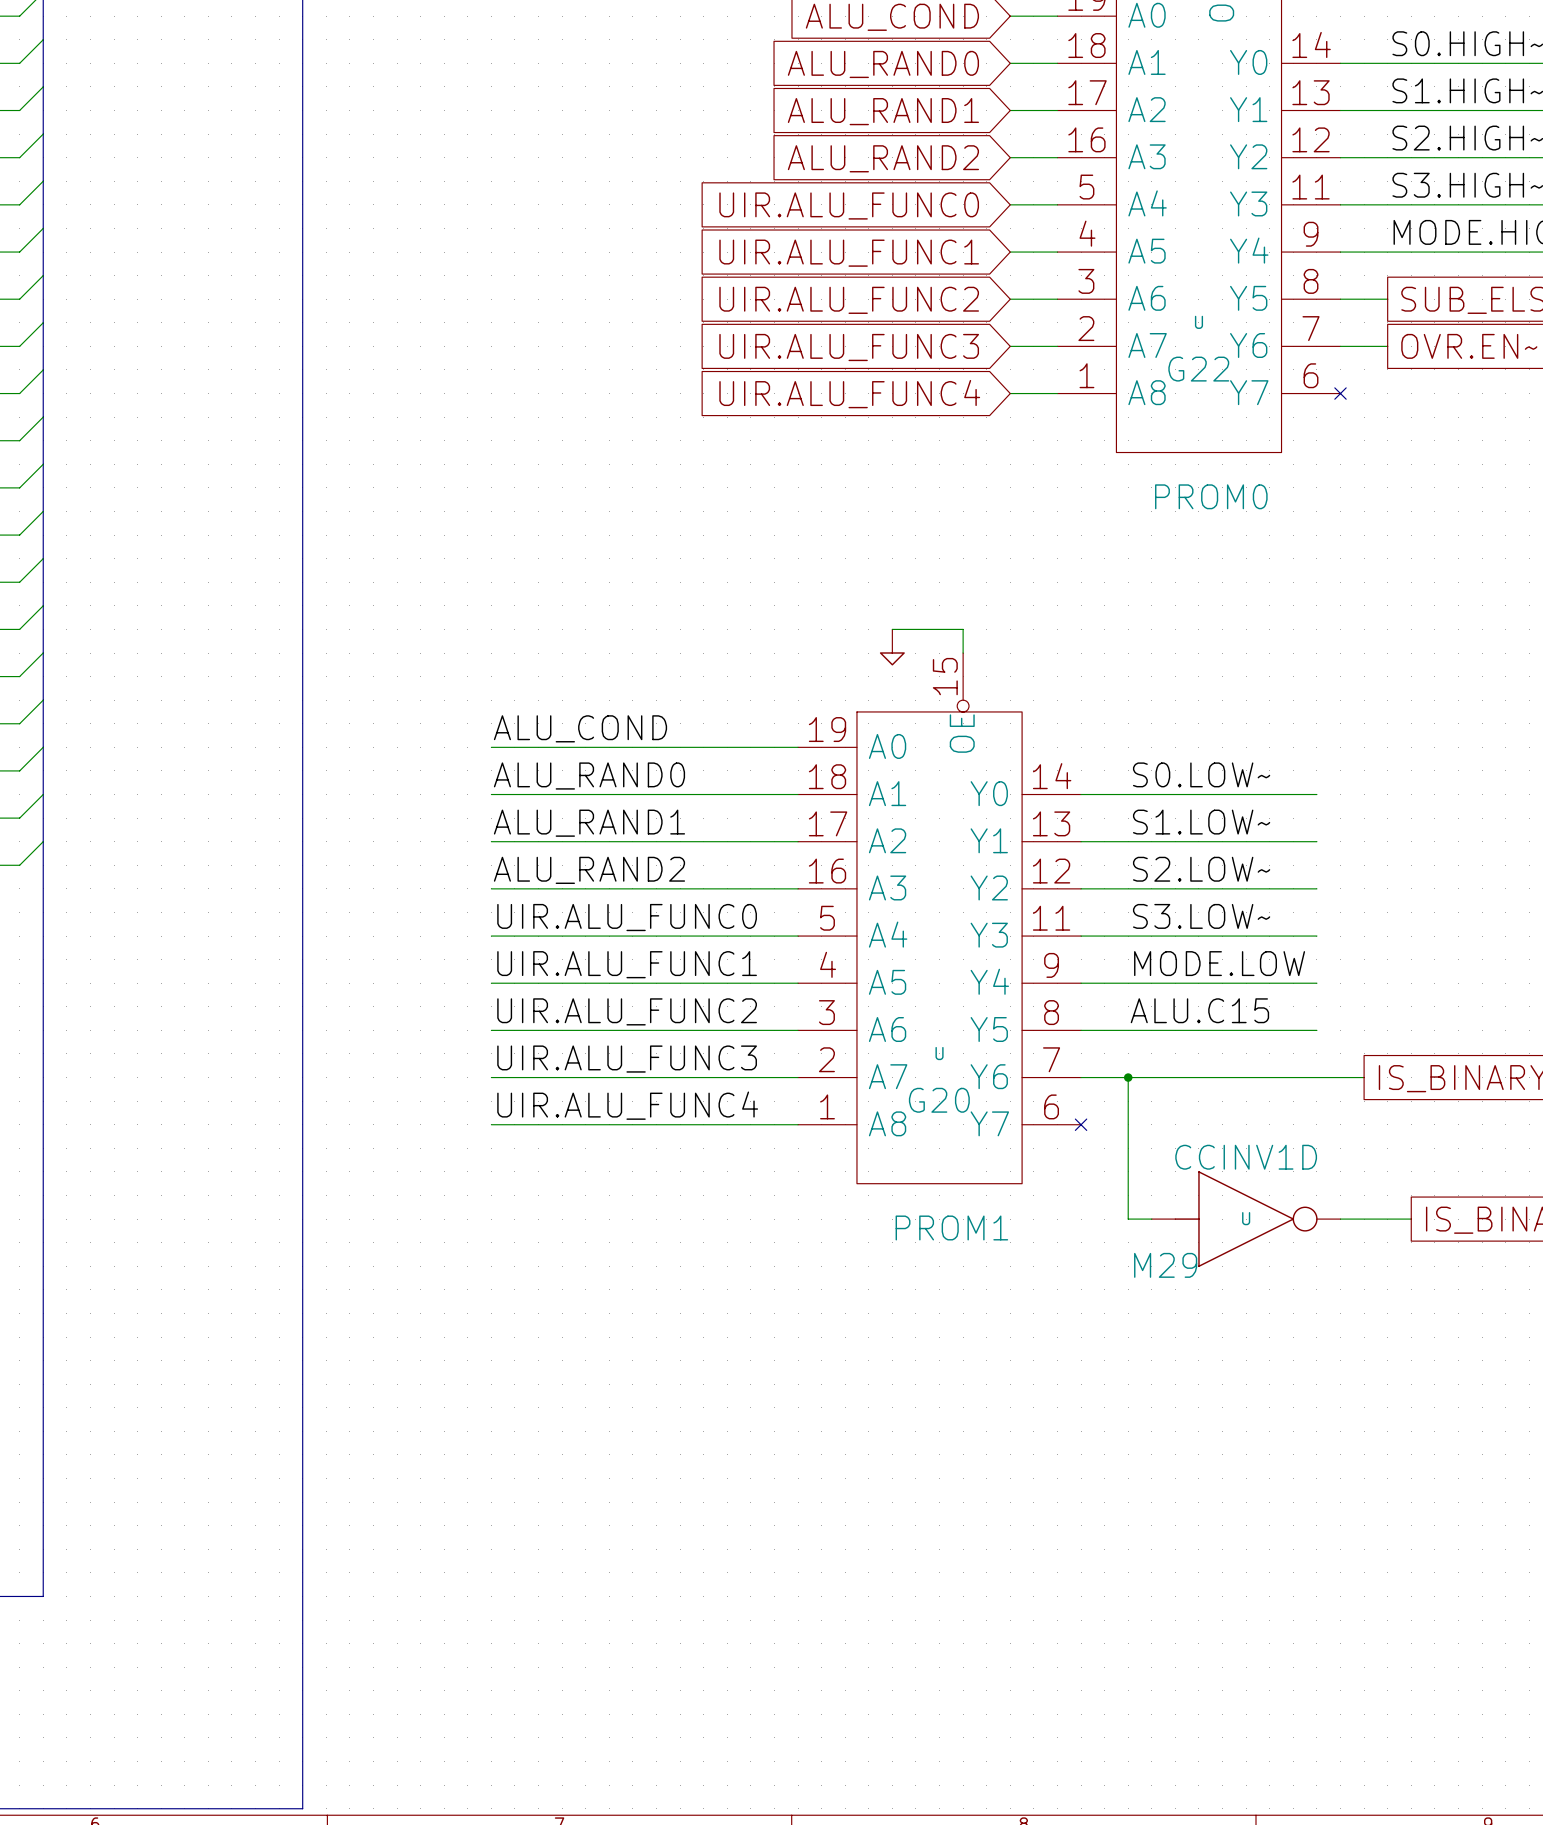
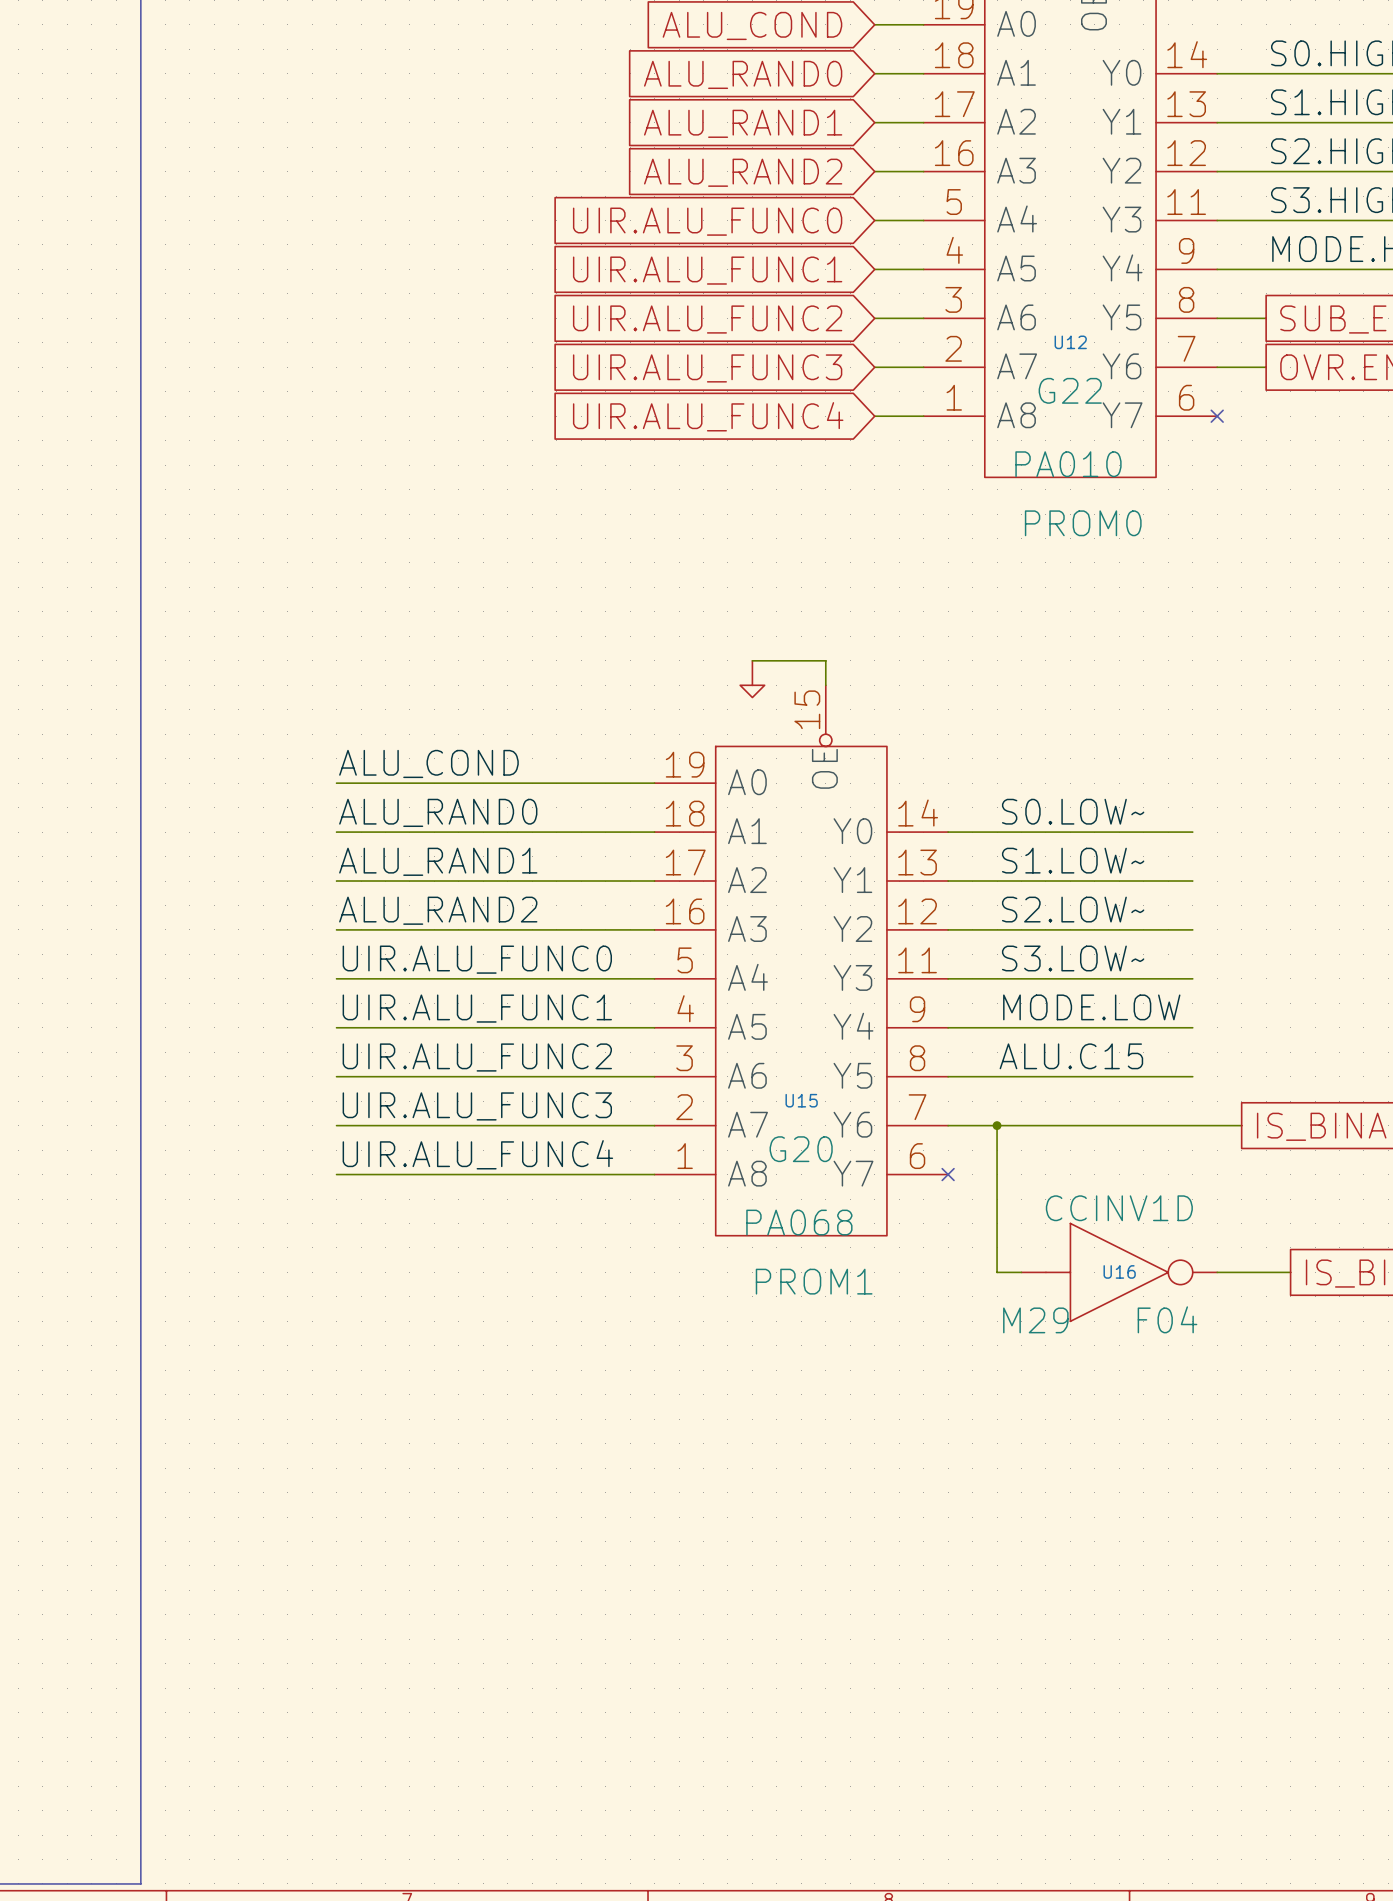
U name: U (1198, 322) -> U12 (1070, 342)
U value: none -> PA010 (1068, 464)
U name: U (939, 1053) -> U15 (801, 1100)
U value: none -> PA068 (799, 1222)
U name: U (1246, 1218) -> U16 (1119, 1271)
U value: none -> F04 (1167, 1319)

